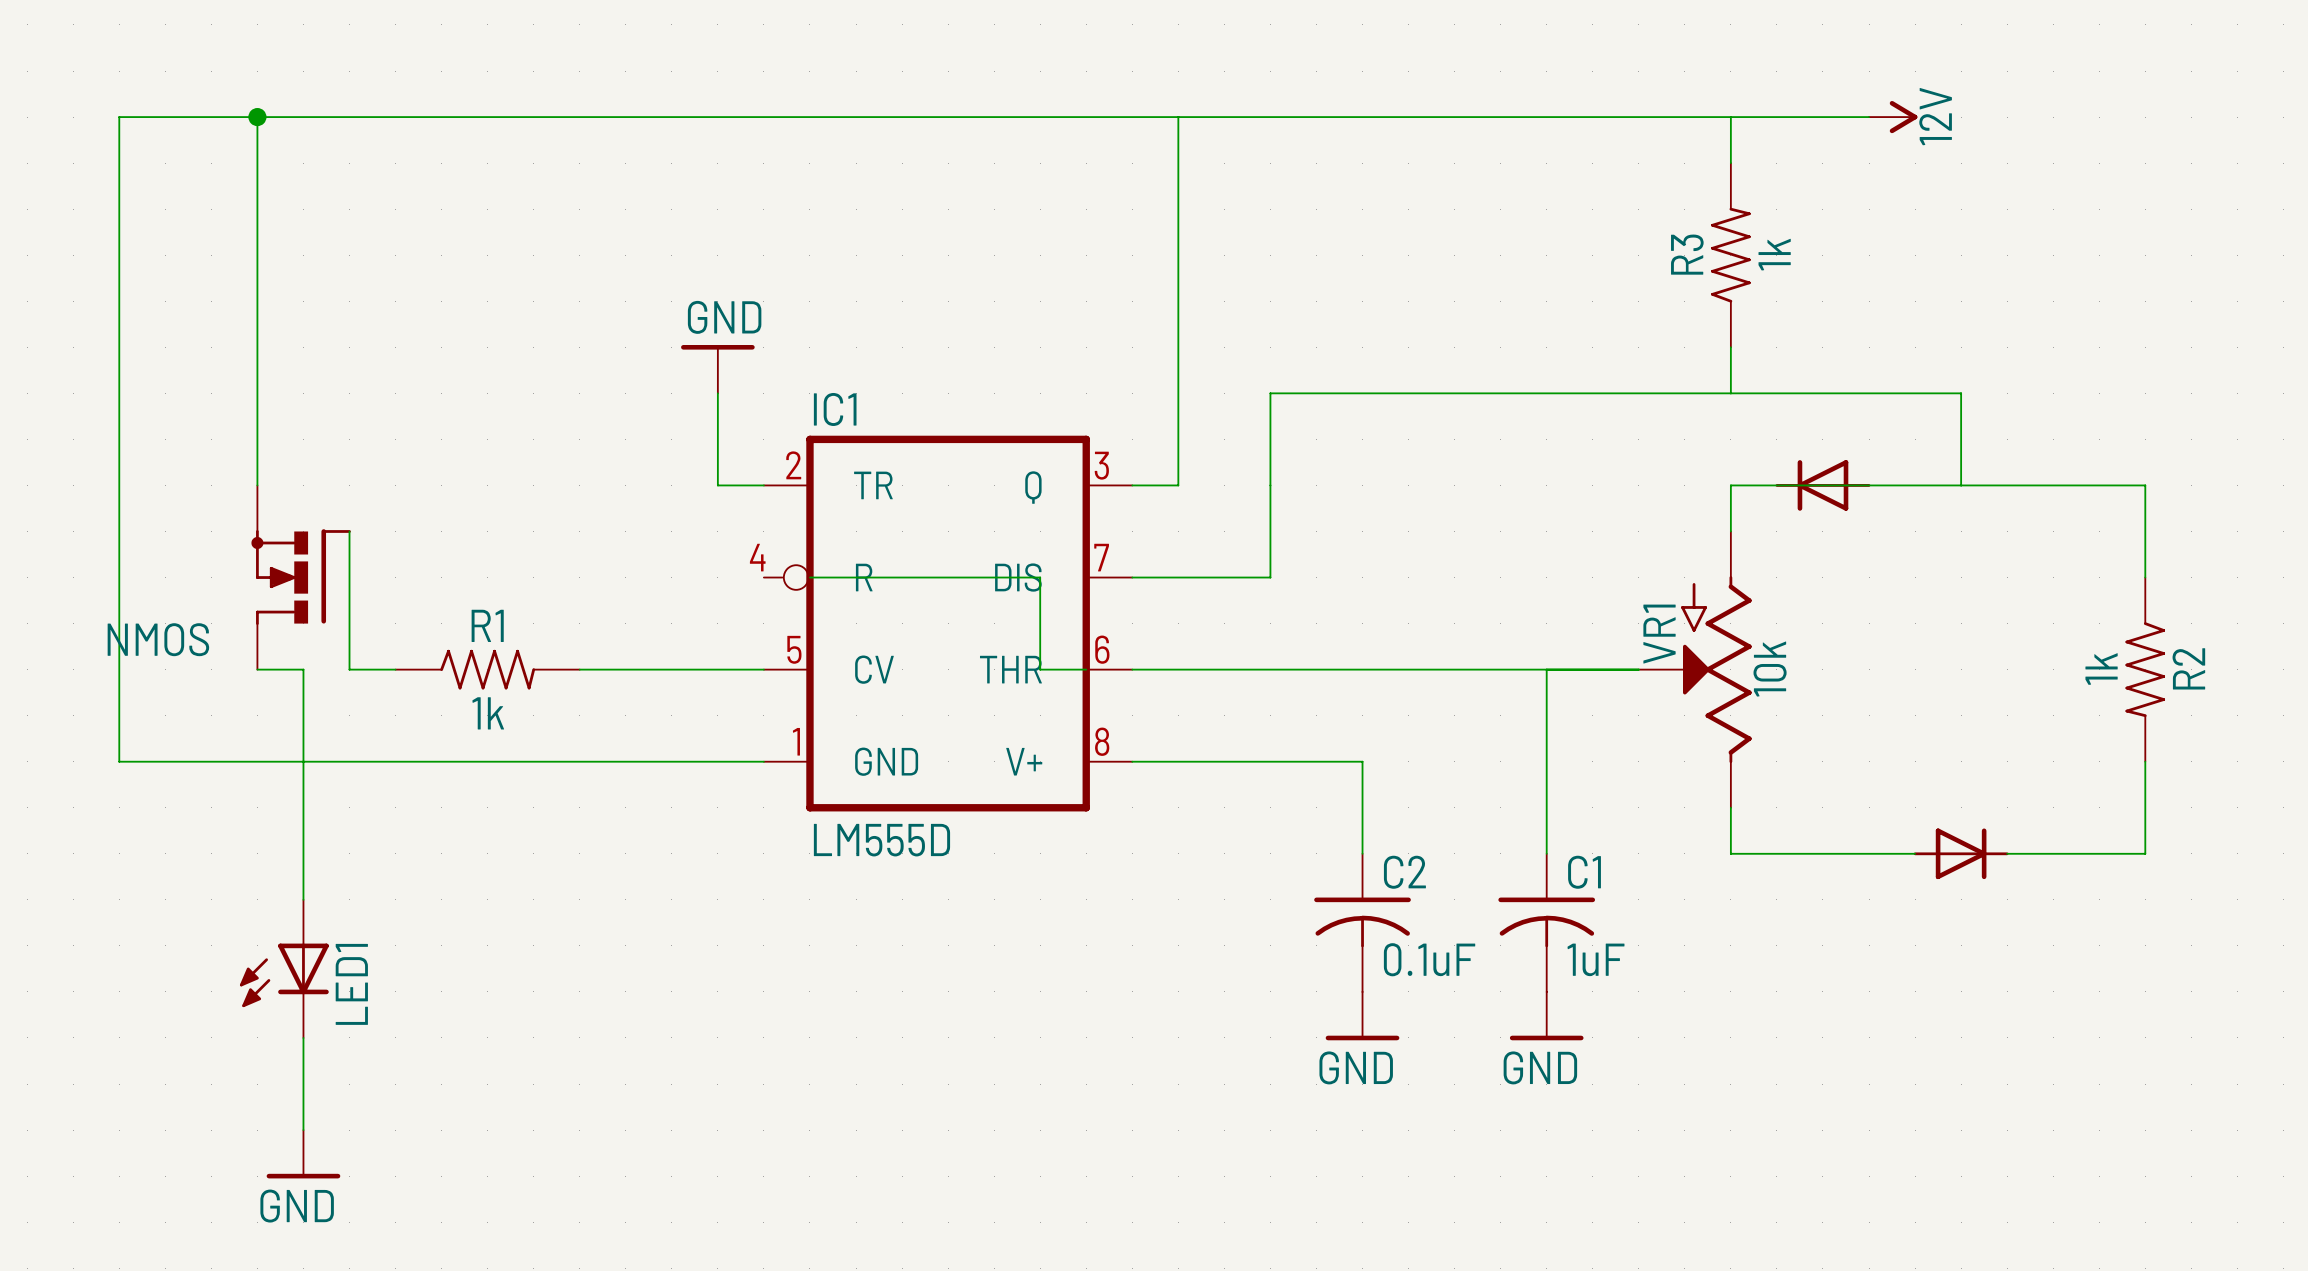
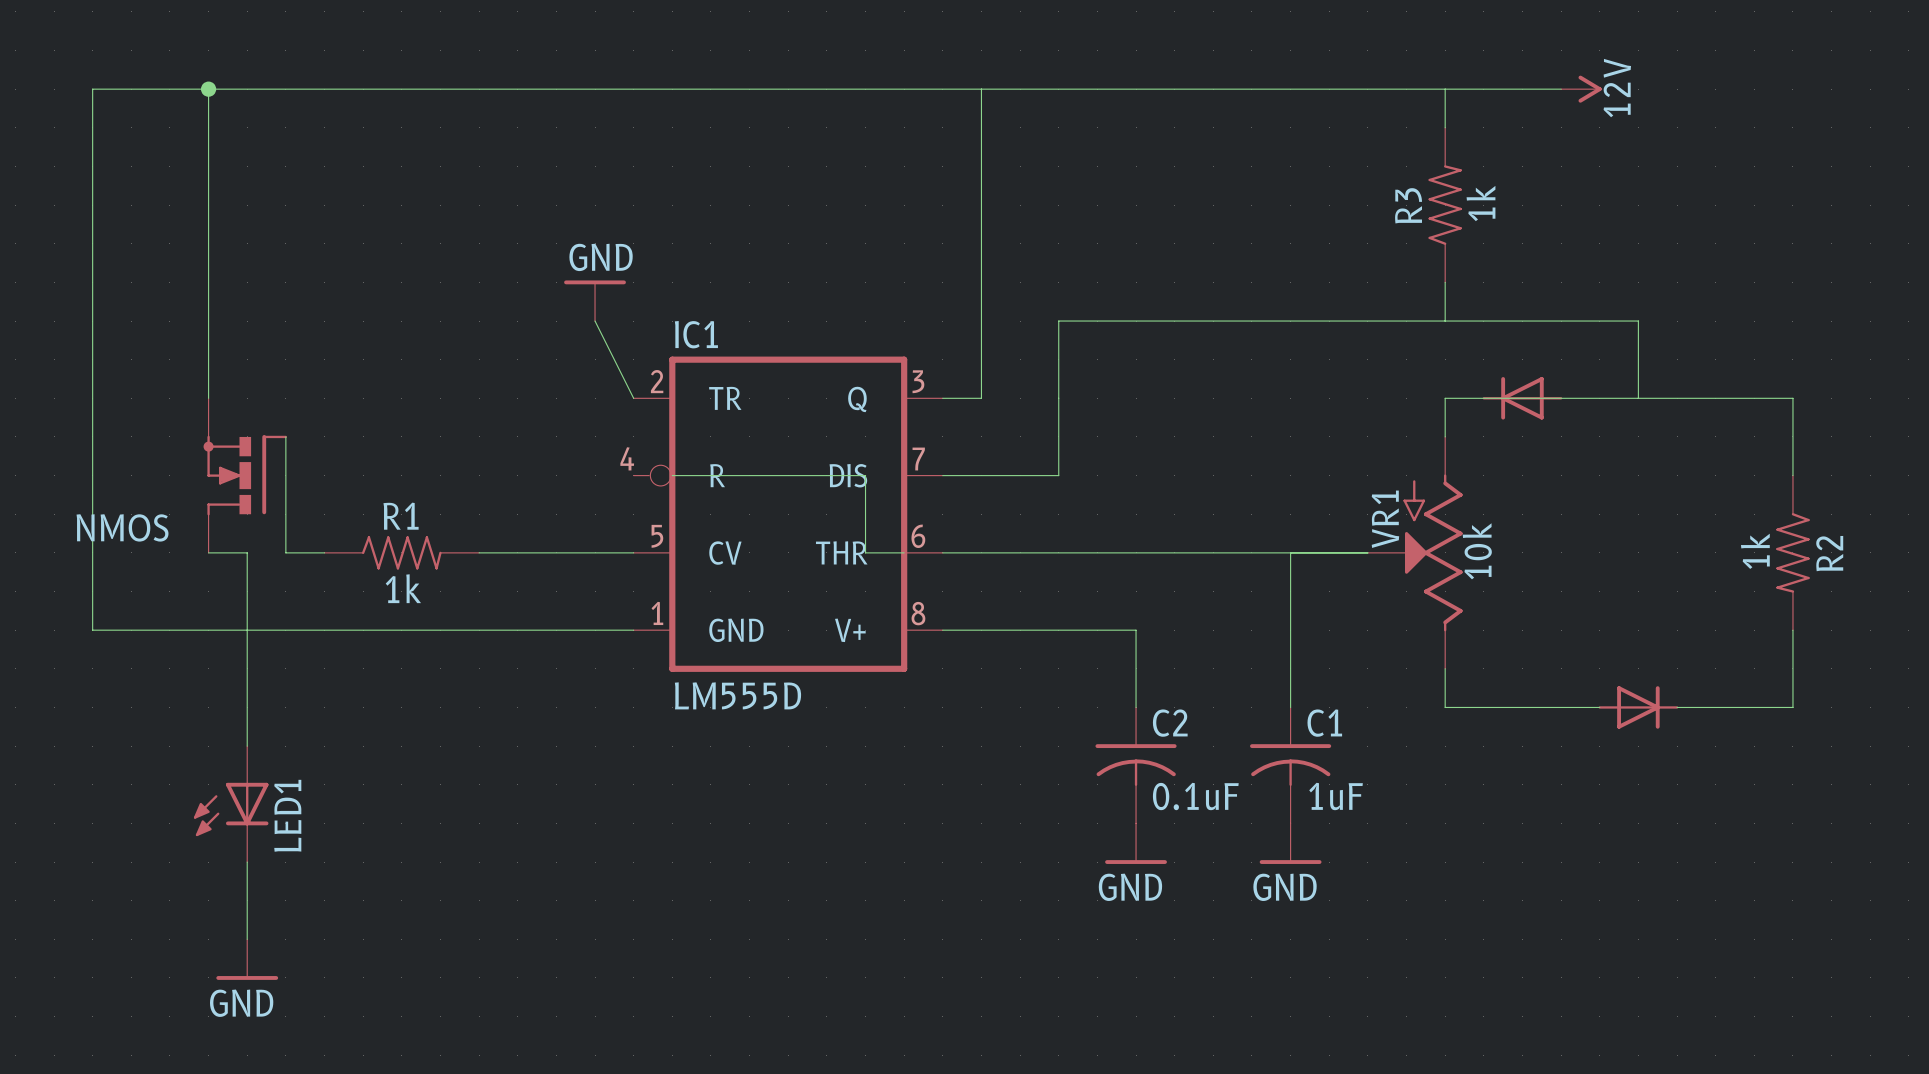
wire: (717, 393) (717, 485) (763, 485) -> (595, 321) (633, 398)

